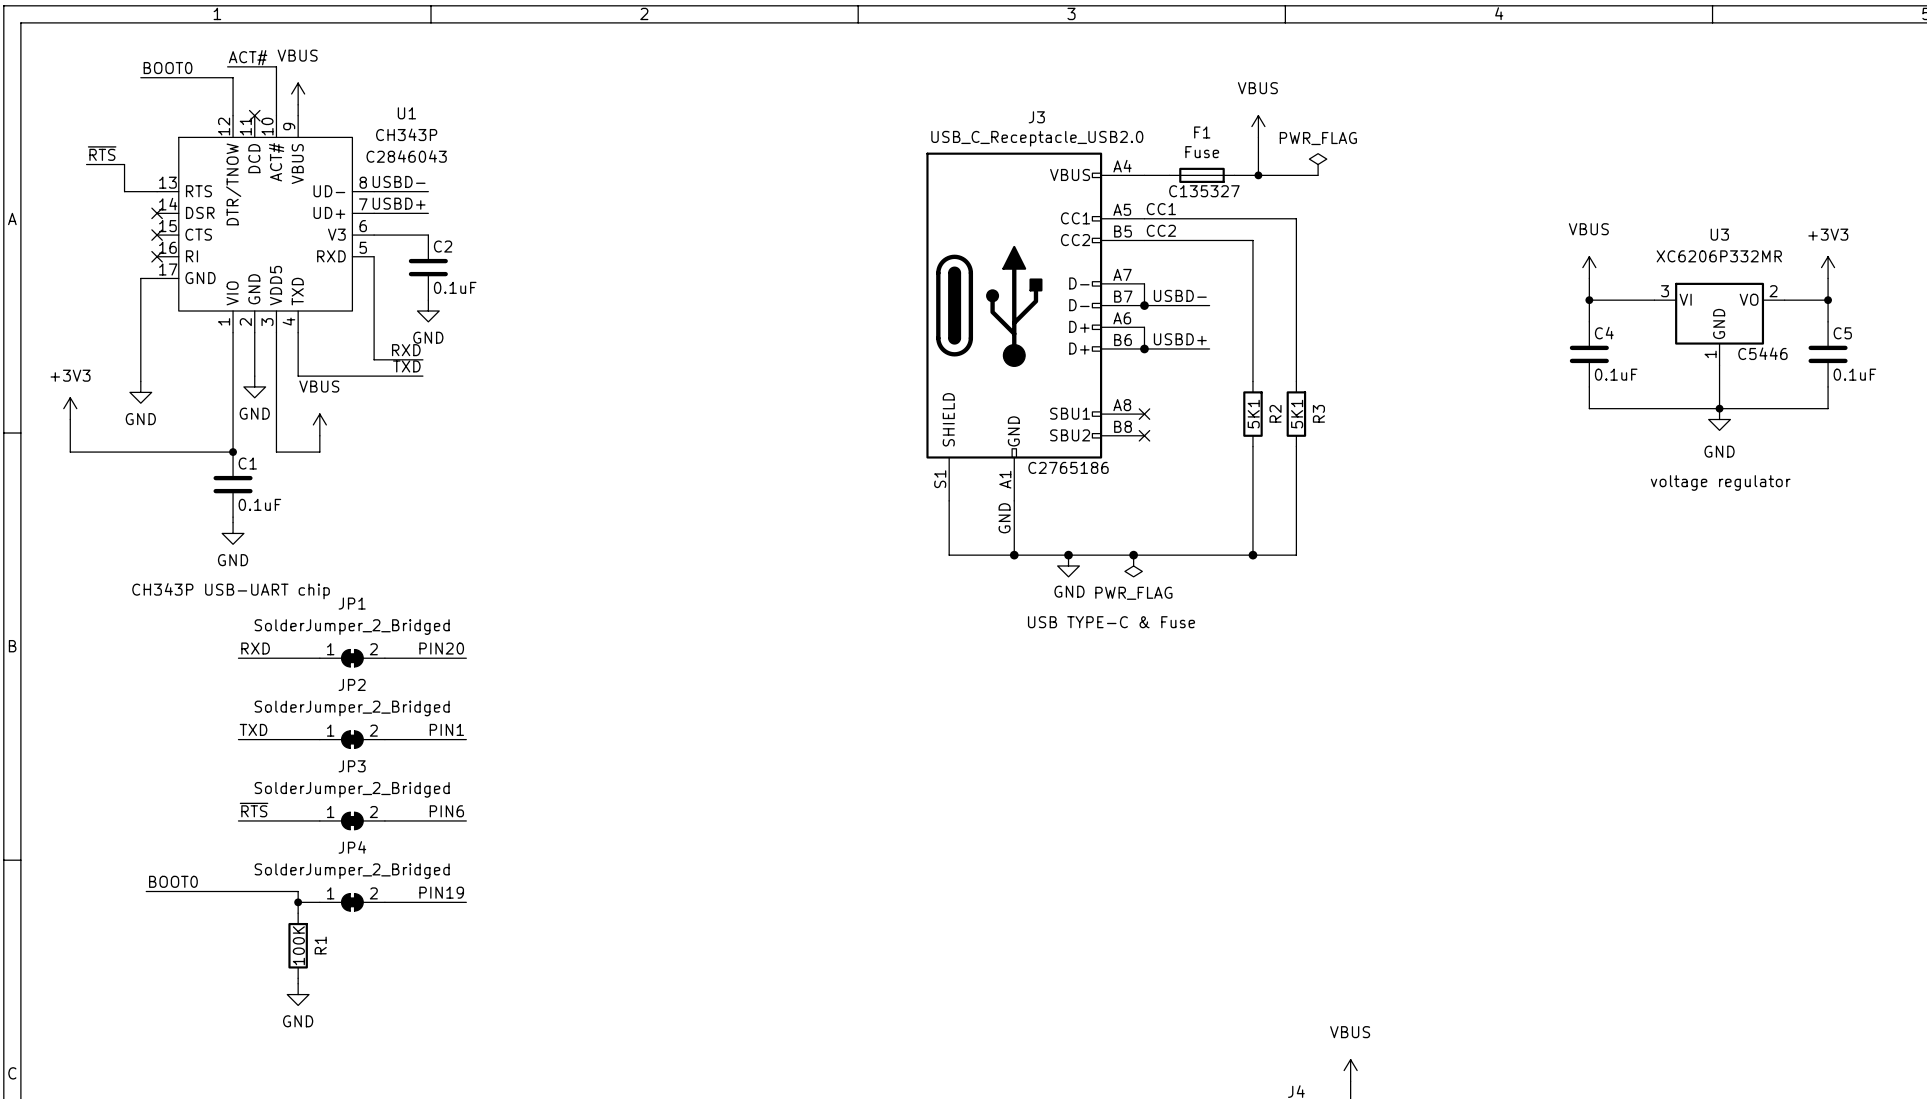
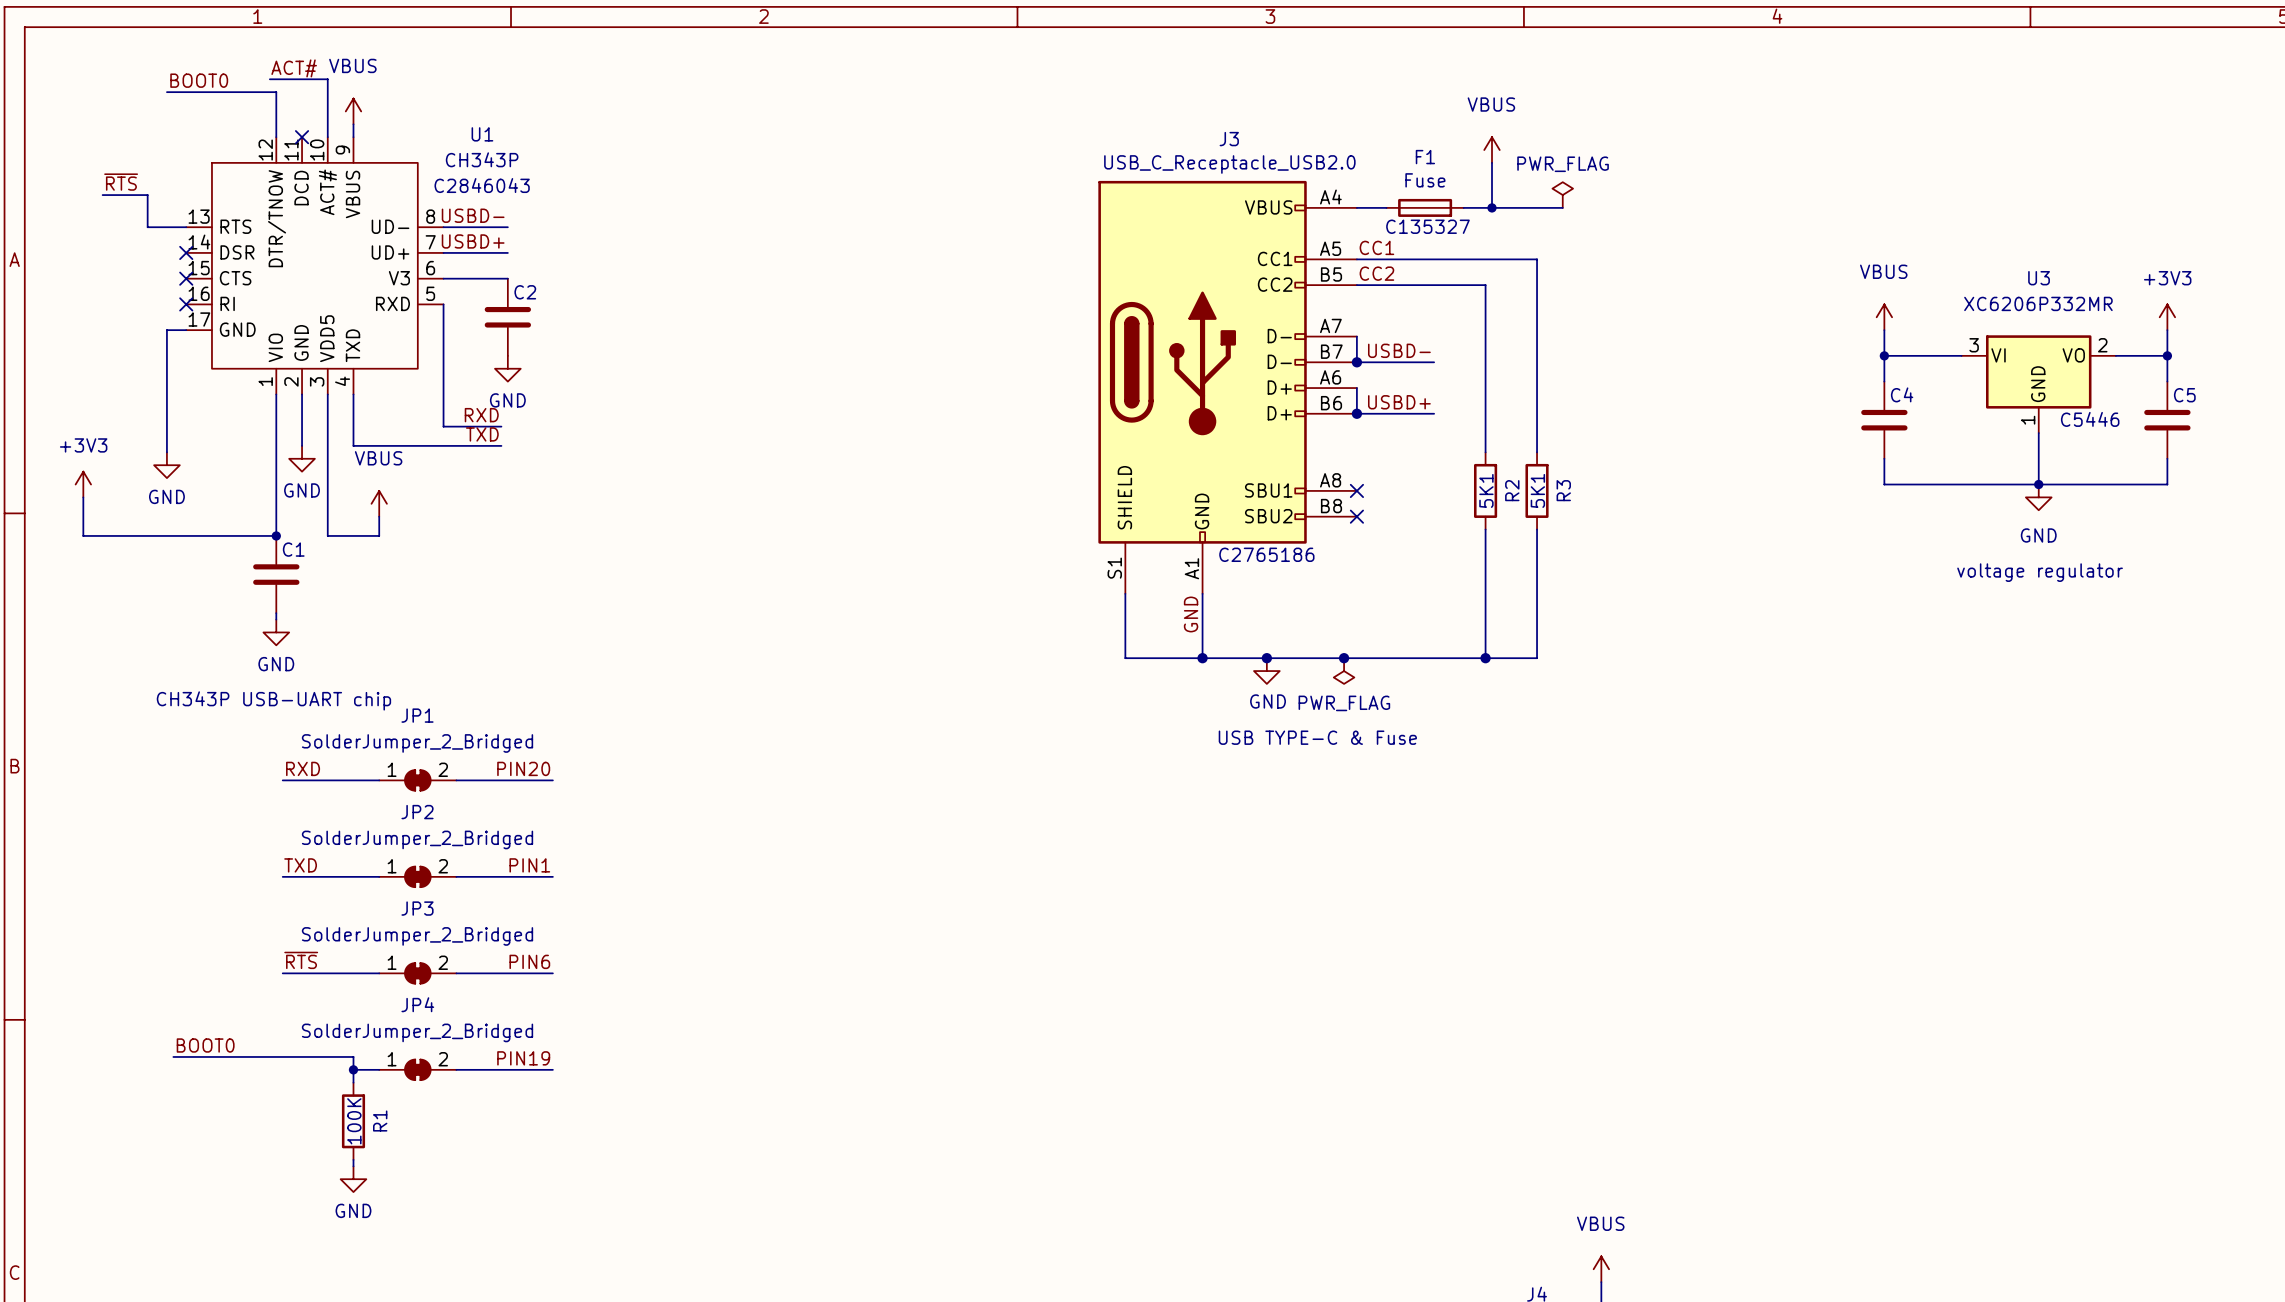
C2 value: 0.1uF (455, 287) -> none
C4 value: 0.1uF (1616, 374) -> none
C5 value: 0.1uF (1854, 374) -> none
C1 value: 0.1uF (259, 504) -> none

